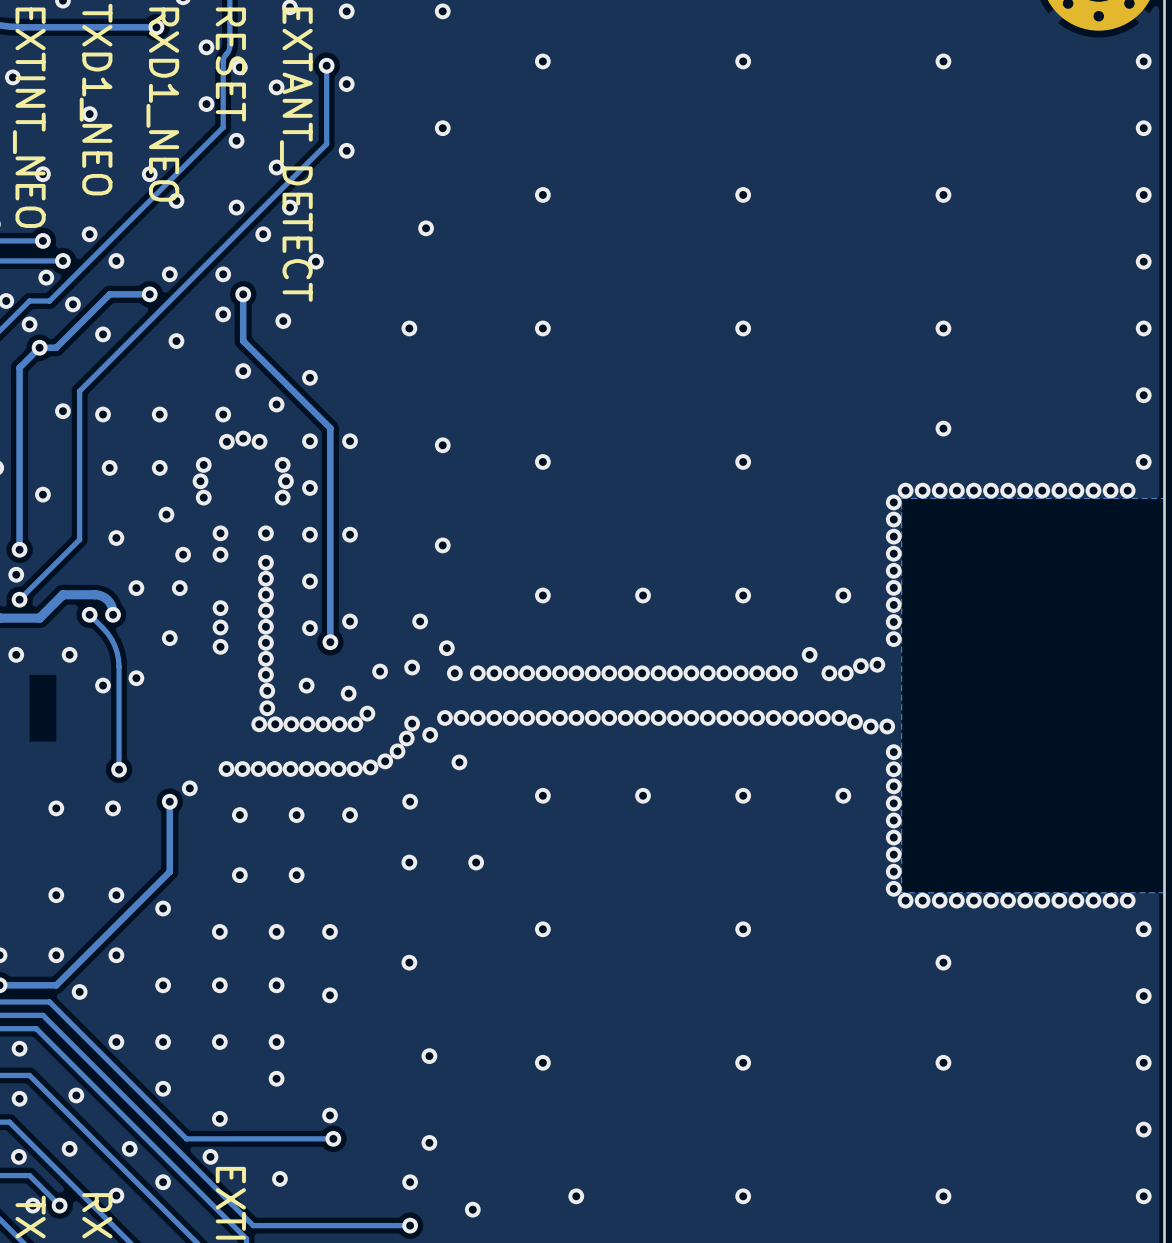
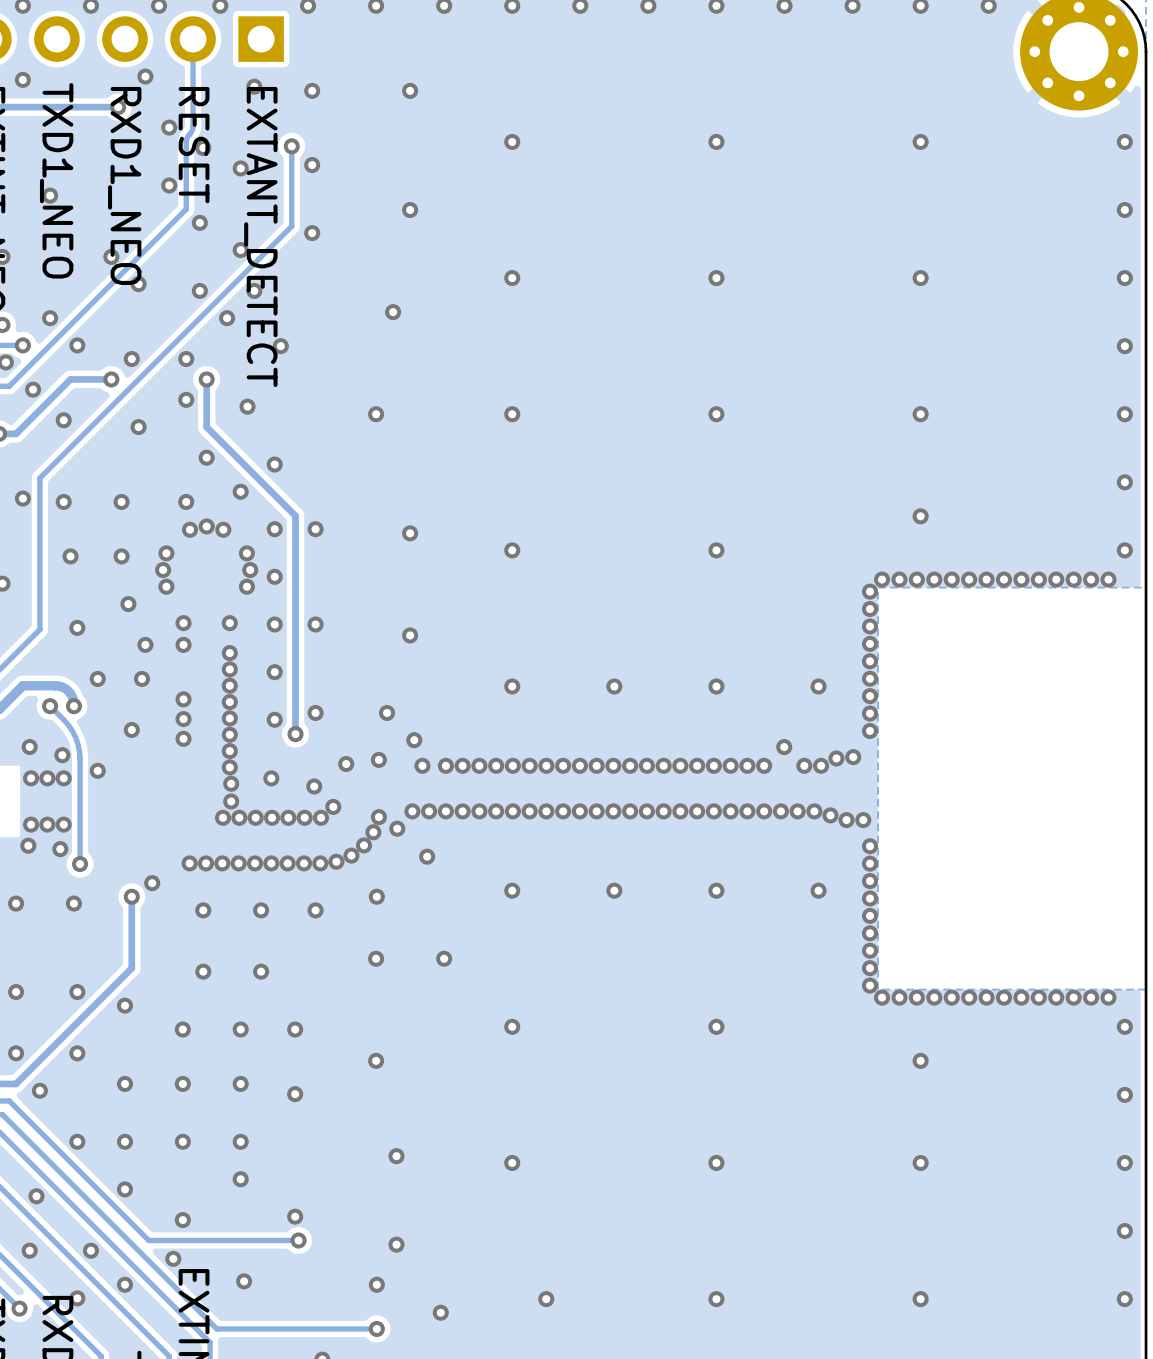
via: none -> (62, 755)
via: none -> (31, 778)
via: none -> (47, 778)
via: none -> (31, 824)
via: none -> (47, 824)
via: none -> (63, 824)
via: none -> (28, 845)
via: none -> (60, 849)

